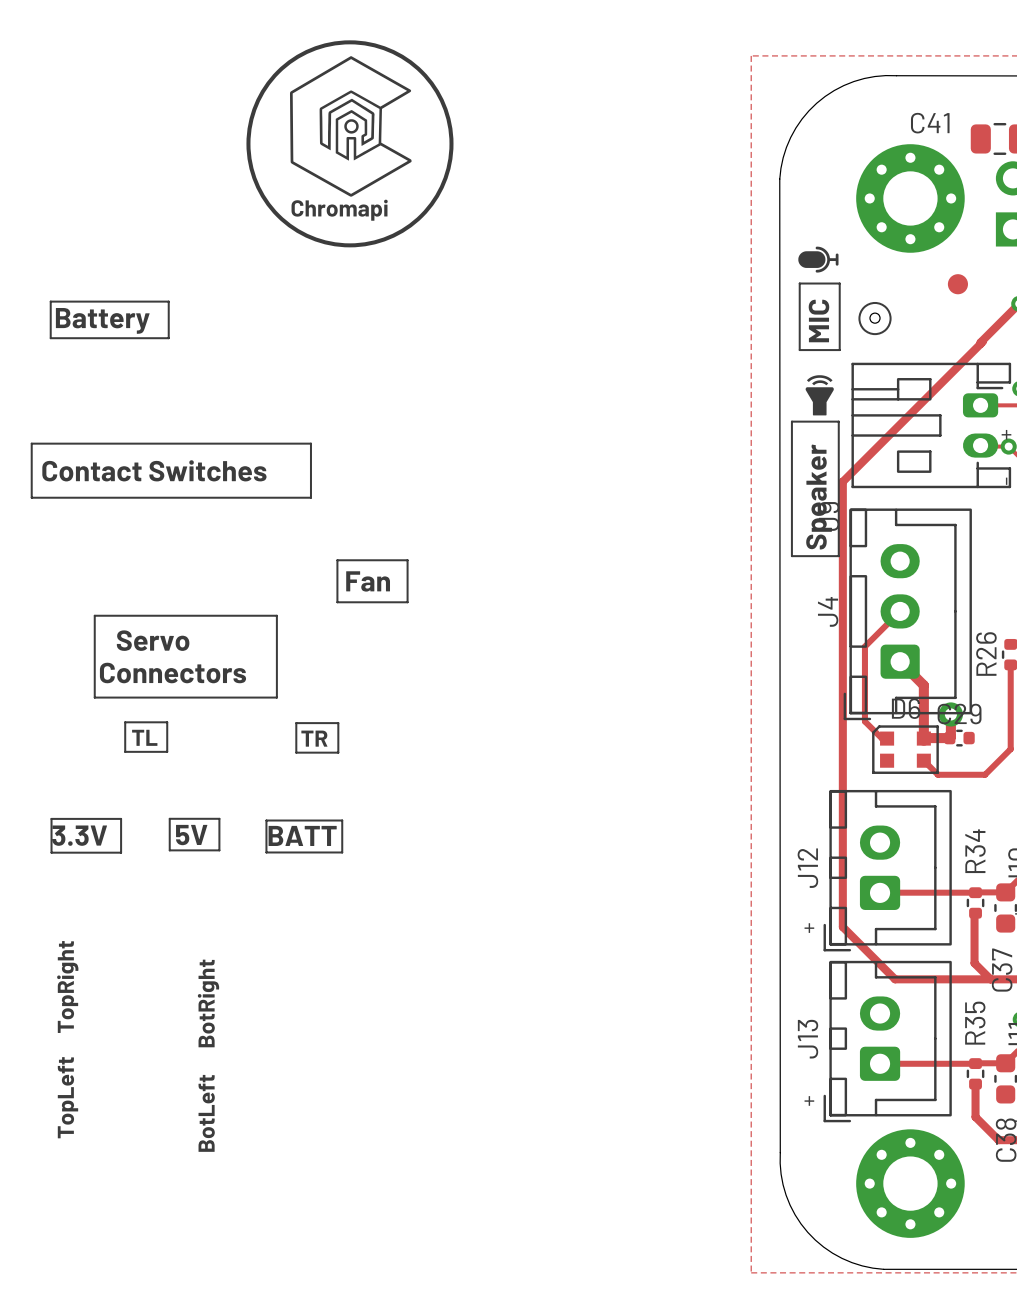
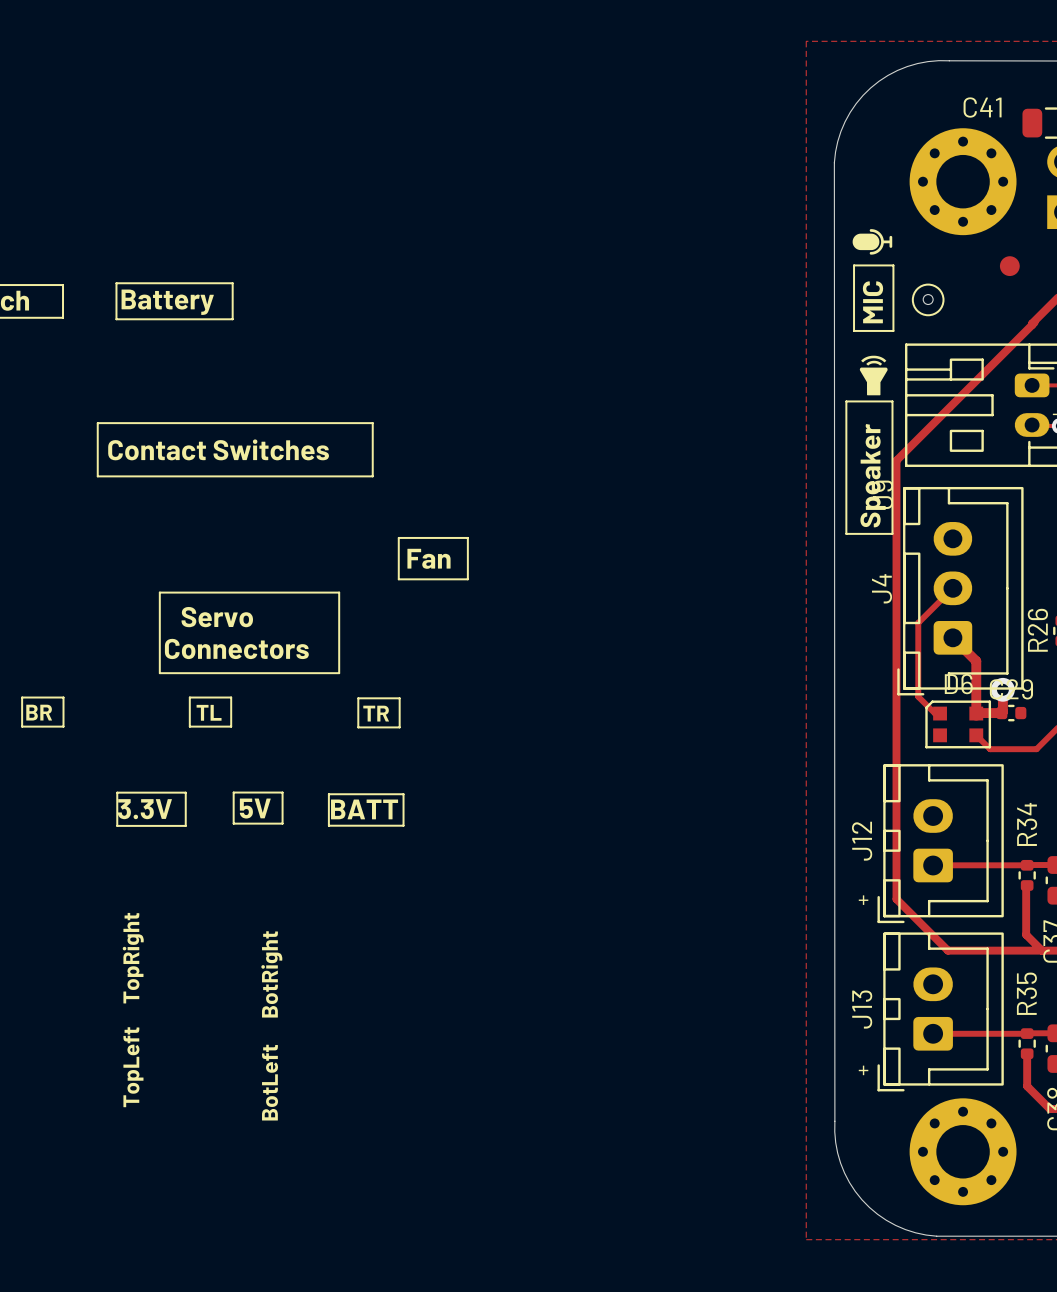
drawing: [246, 40, 454, 248] -> none
text: Chromapi (339, 210) -> none

